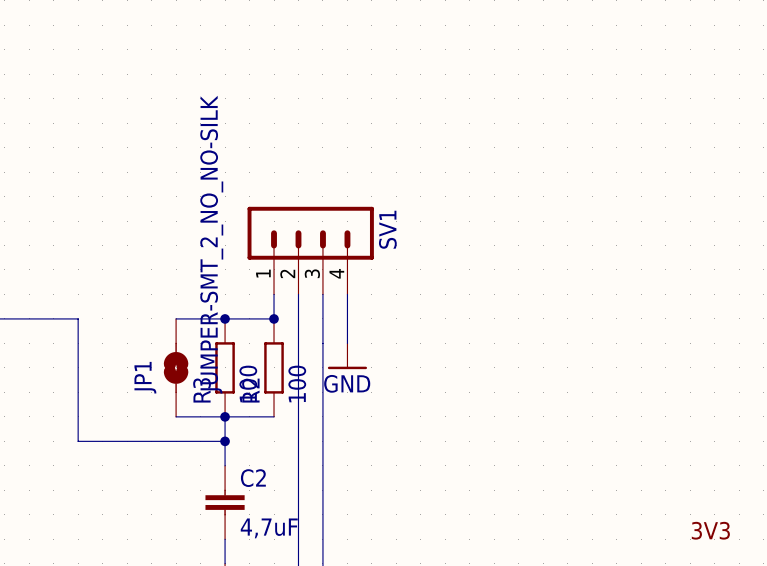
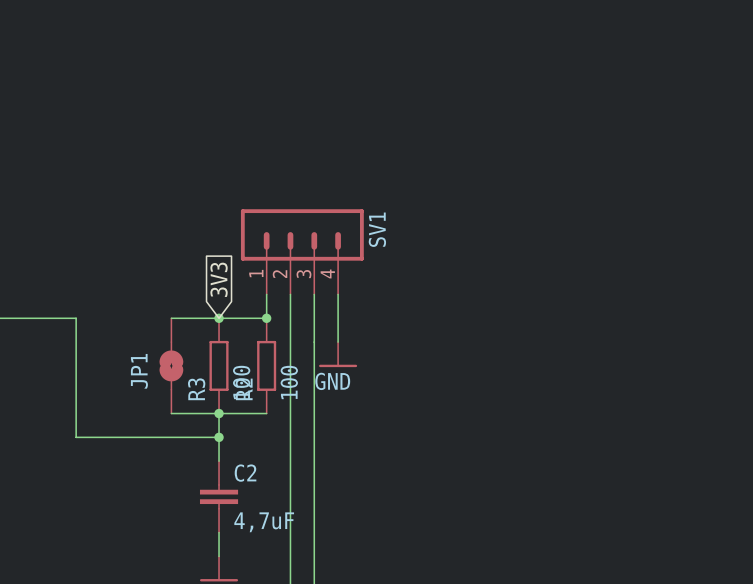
JP1 value: JUMPER-SMT_2_NO_NO-SILK (211, 244) -> none
global label: none -> 3V3 (219, 279)
label: 3V3 (710, 530) -> none

